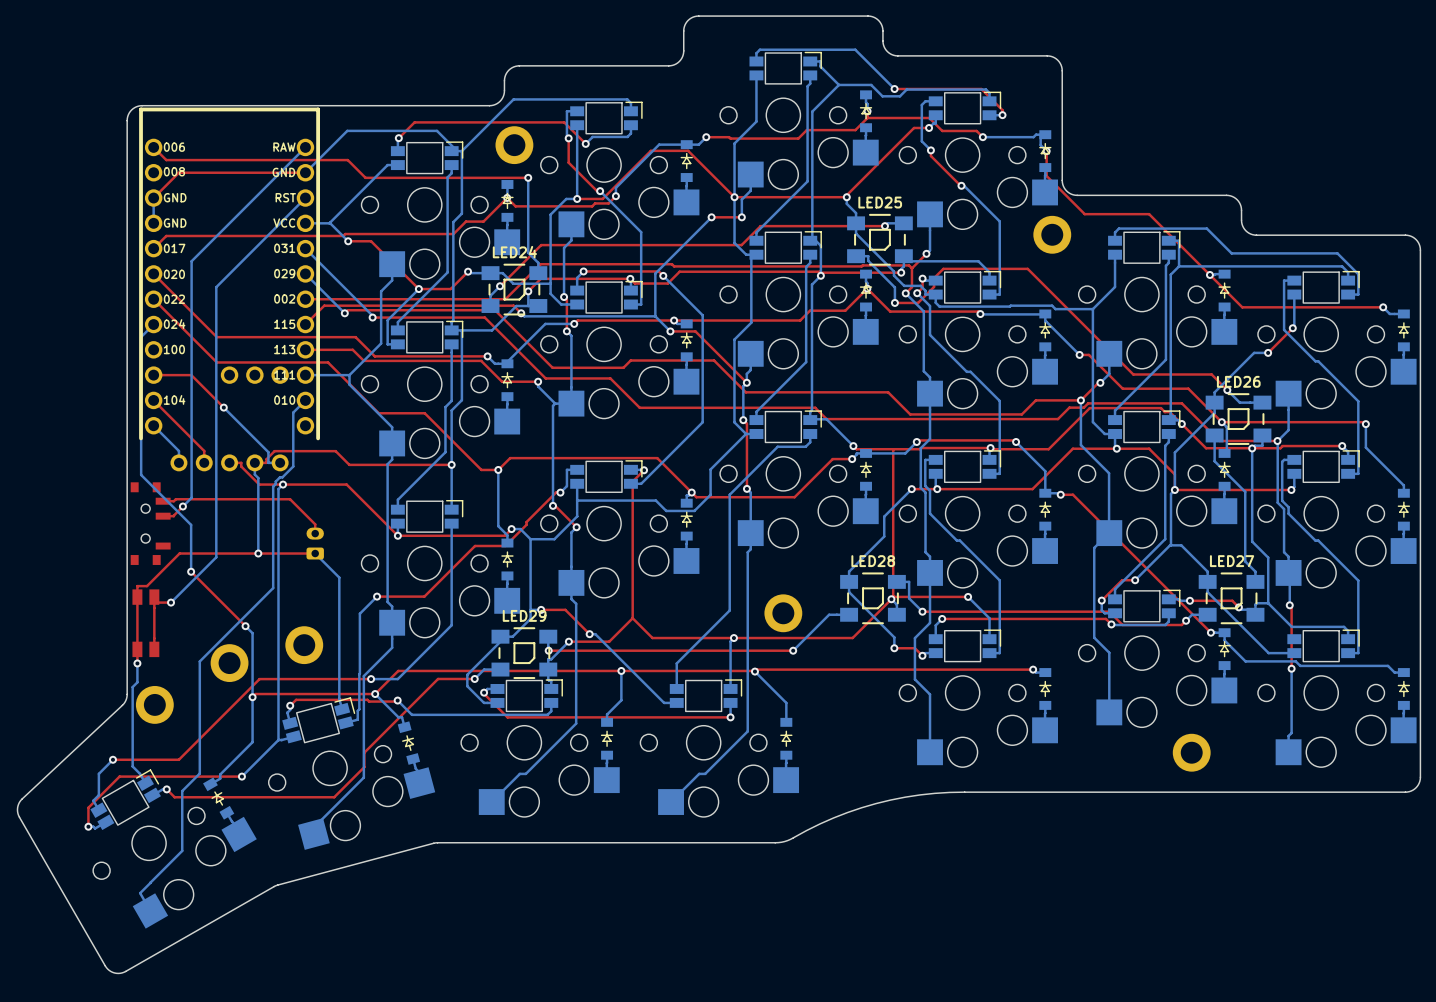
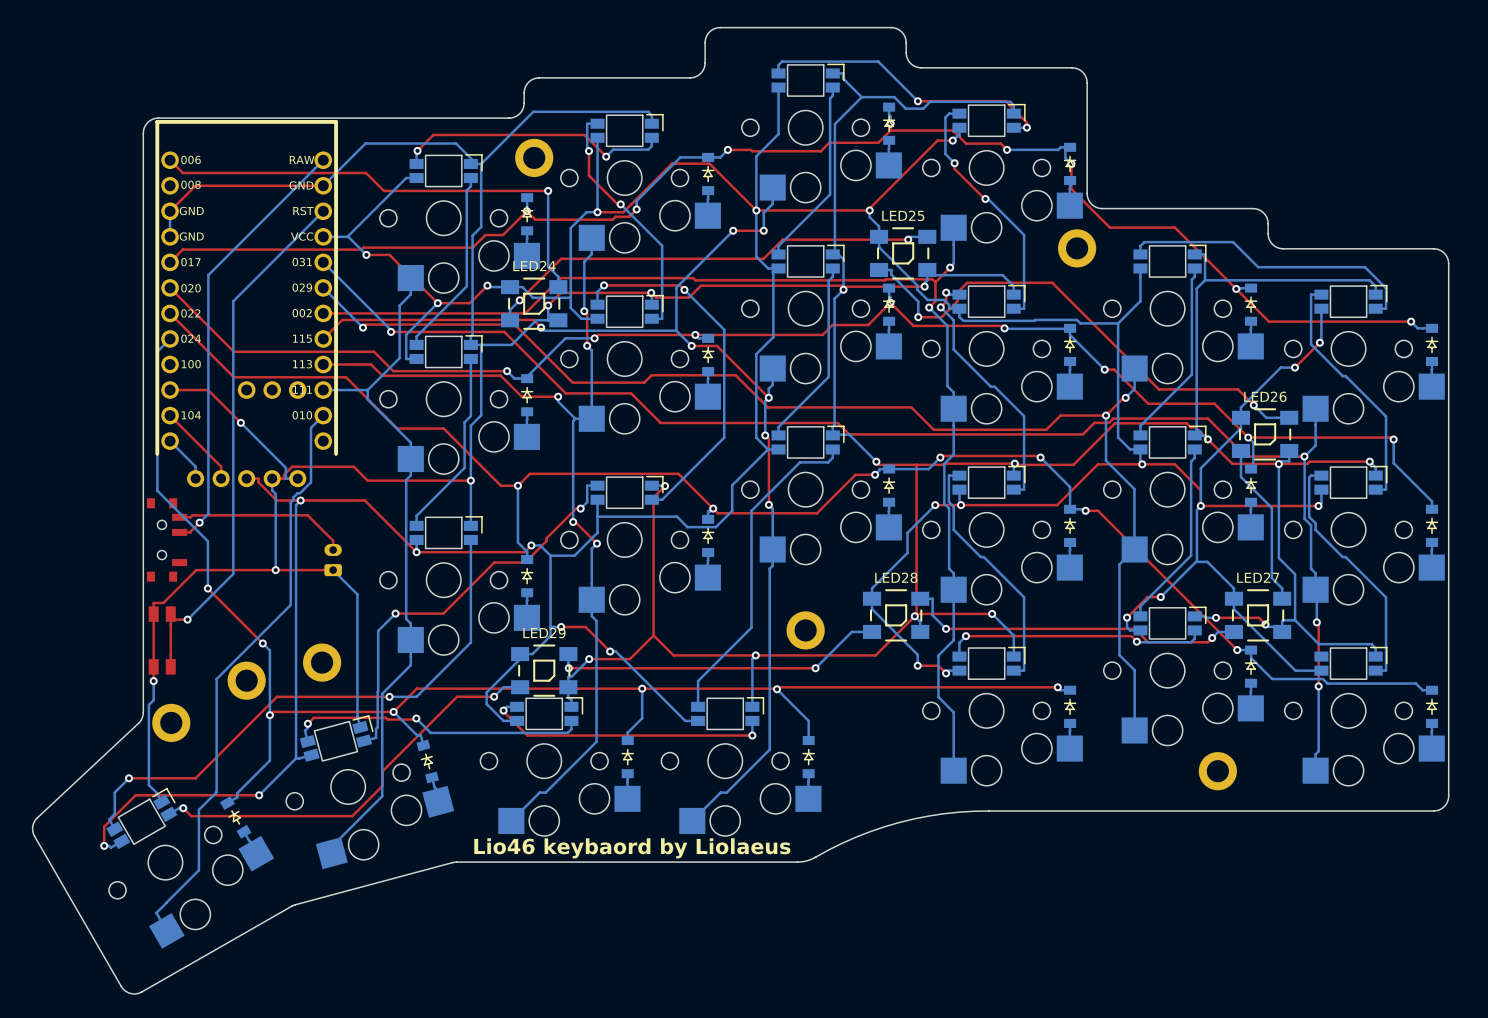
text: none -> Lio46 keybaord by Liolaeus (632, 848)

